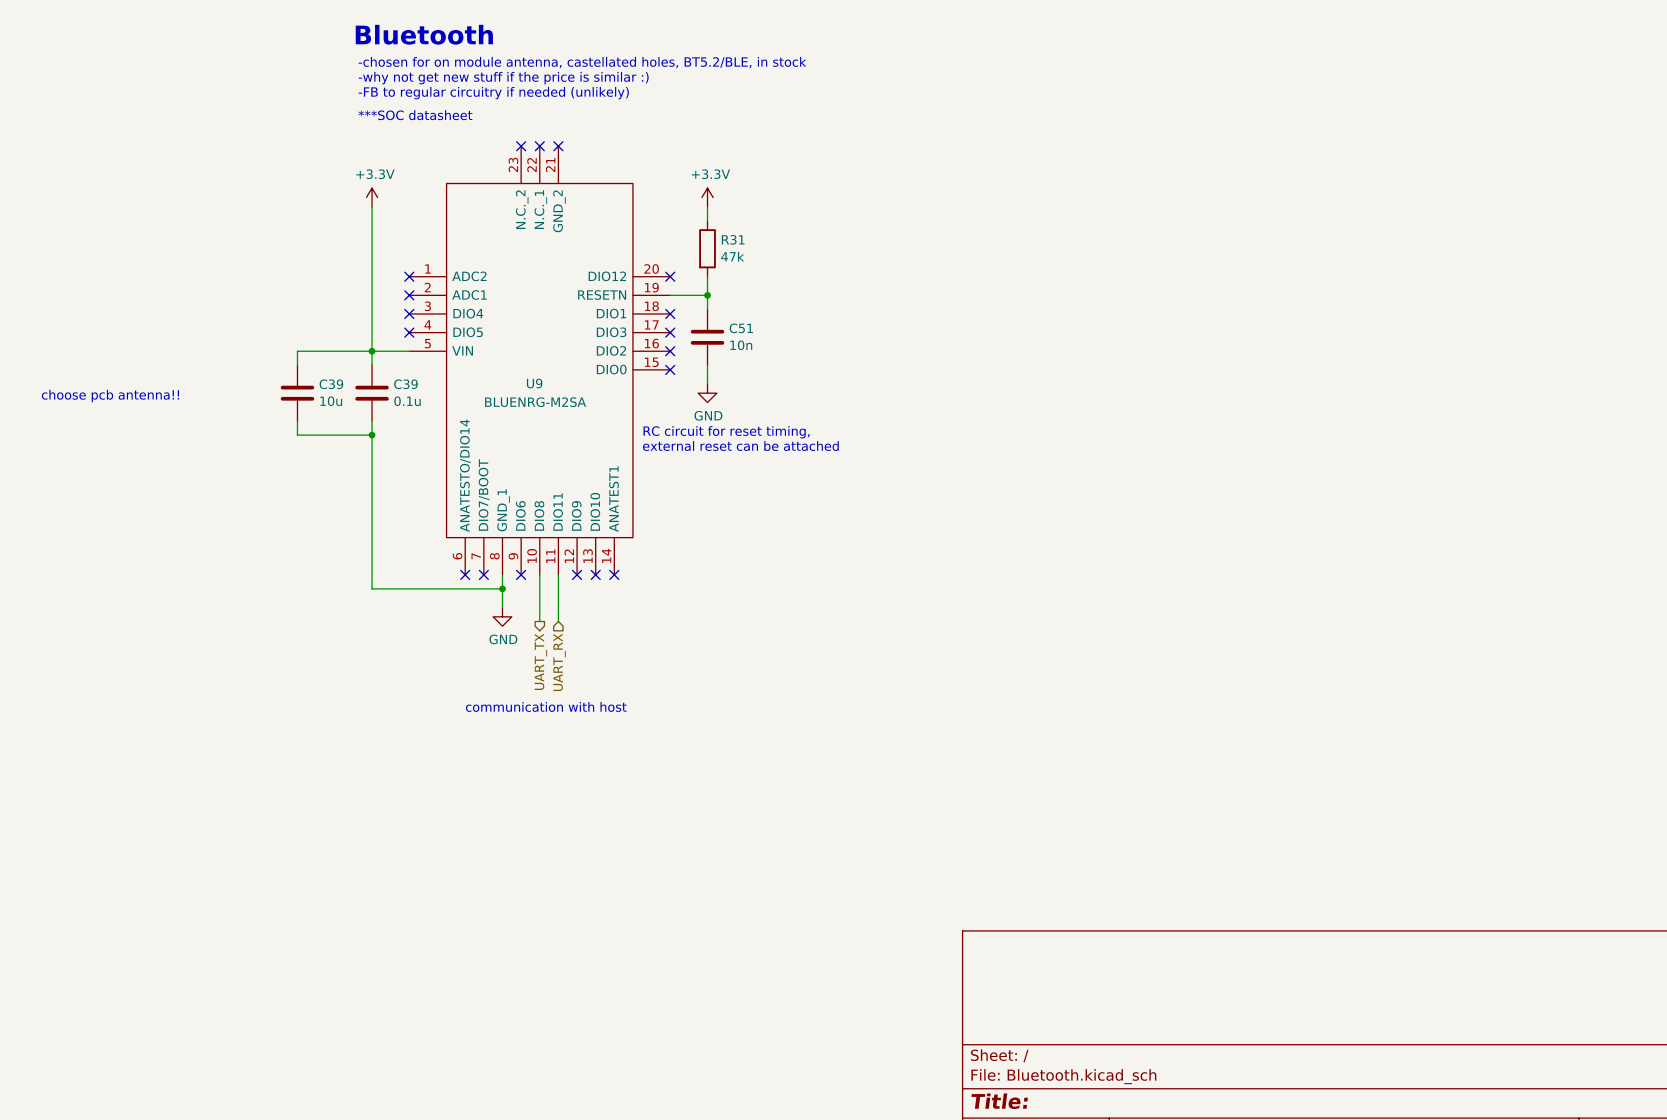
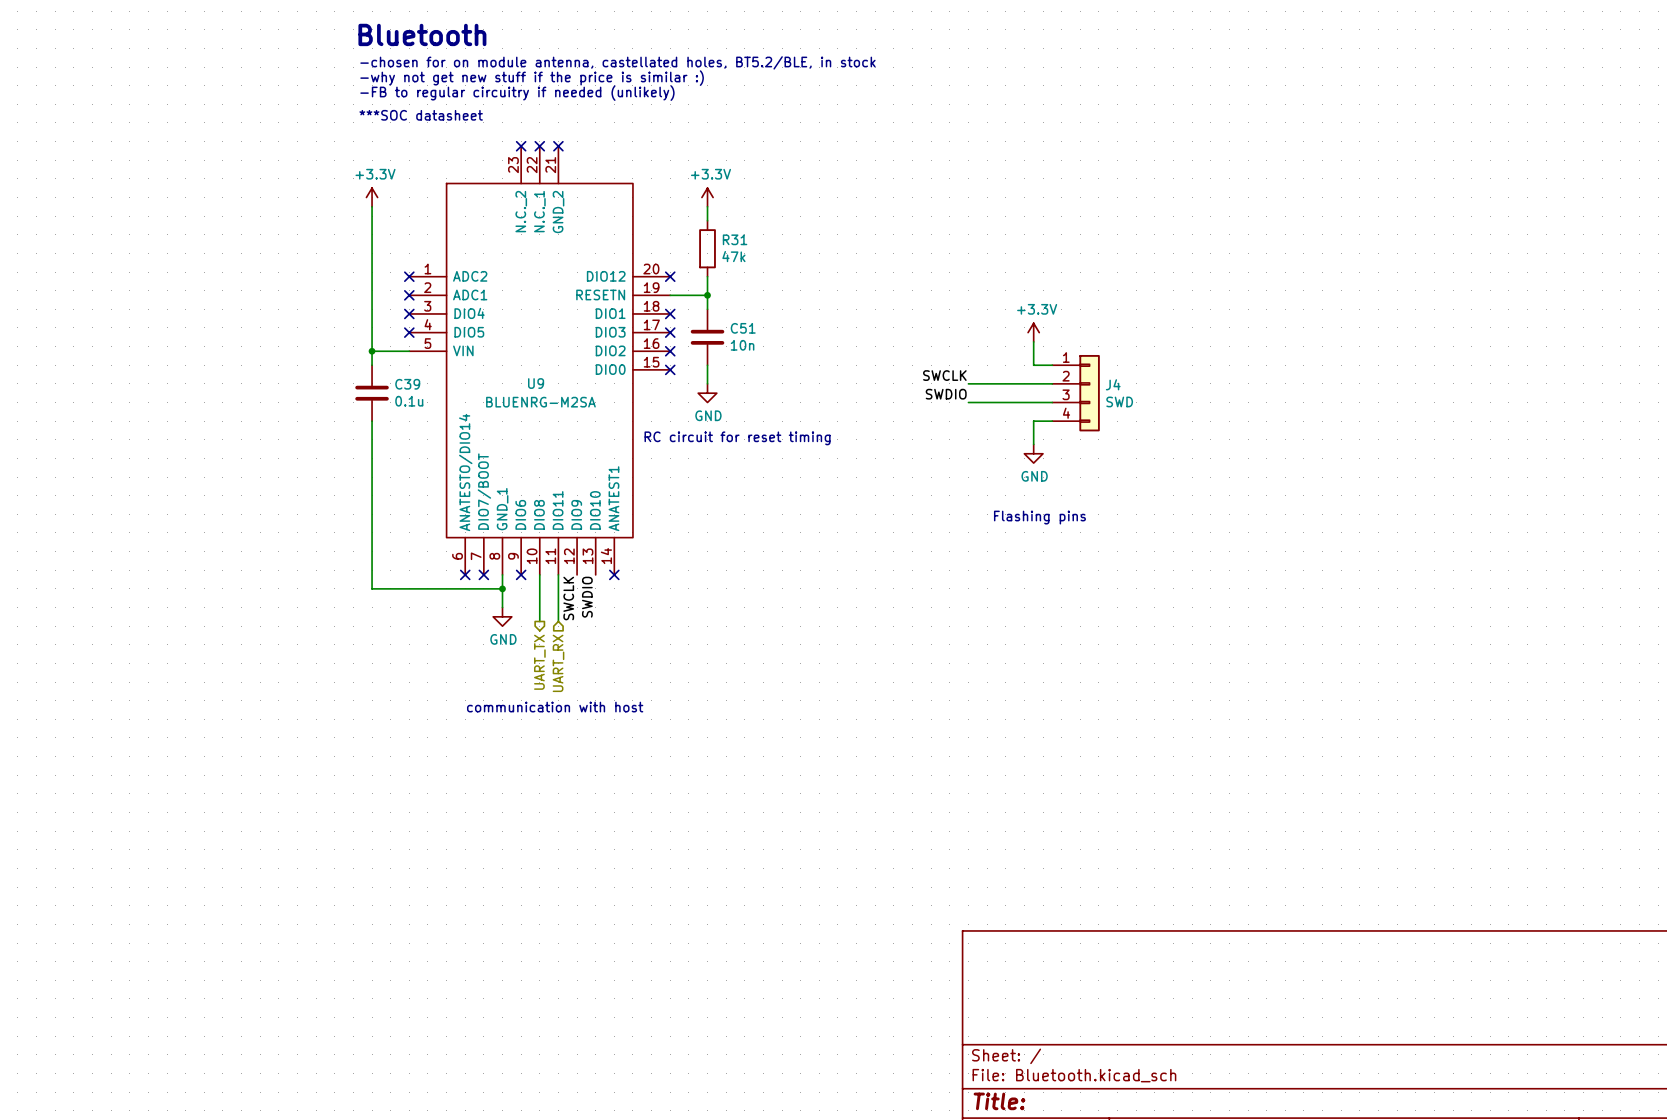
power symbol: none -> +3.3V (1033, 332)
wire: none -> (1033, 341) (1033, 365) (1052, 365)
wire: (372, 351) (297, 351) (297, 365) -> none
label: none -> SWCLK (944, 375)
wire: none -> (968, 383) (1052, 383)
C39: 10u (297, 393) -> none
J4: none -> SWD (1076, 393)
label: none -> SWDIO (946, 394)
text: choose pcb antenna!! (110, 396) -> none
wire: none -> (968, 402) (1052, 402)
wire: (297, 421) (297, 435) (372, 435) -> none
wire: none -> (1052, 421) (1033, 421) (1033, 444)
text: RC circuit for reset timing, (726, 432) -> RC circuit for reset timing (737, 438)
junction: (372, 435) -> none
text: external reset can be attached (740, 446) -> none
power symbol: none -> GND (1033, 453)
text: none -> Flashing pins (1039, 517)
no-connect mark: (577, 574) -> none
no-connect mark: (595, 574) -> none
label: none -> SWCLK (568, 598)
label: none -> SWDIO (587, 597)

